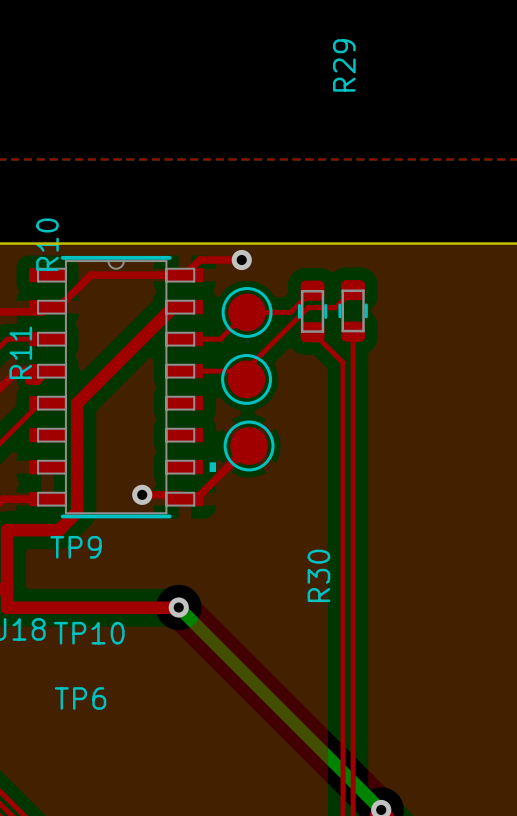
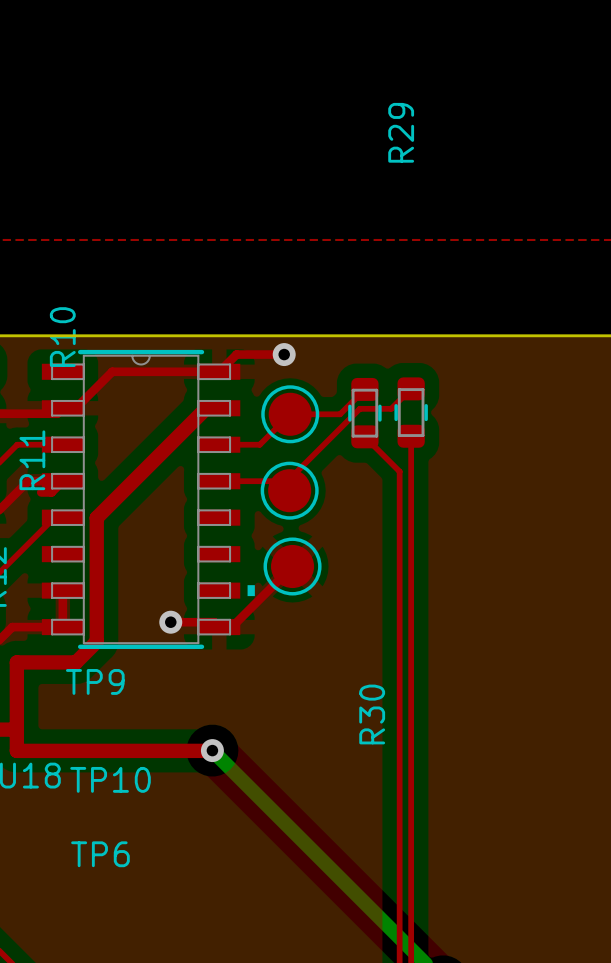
top track: none -> (62, 590) (62, 627)

